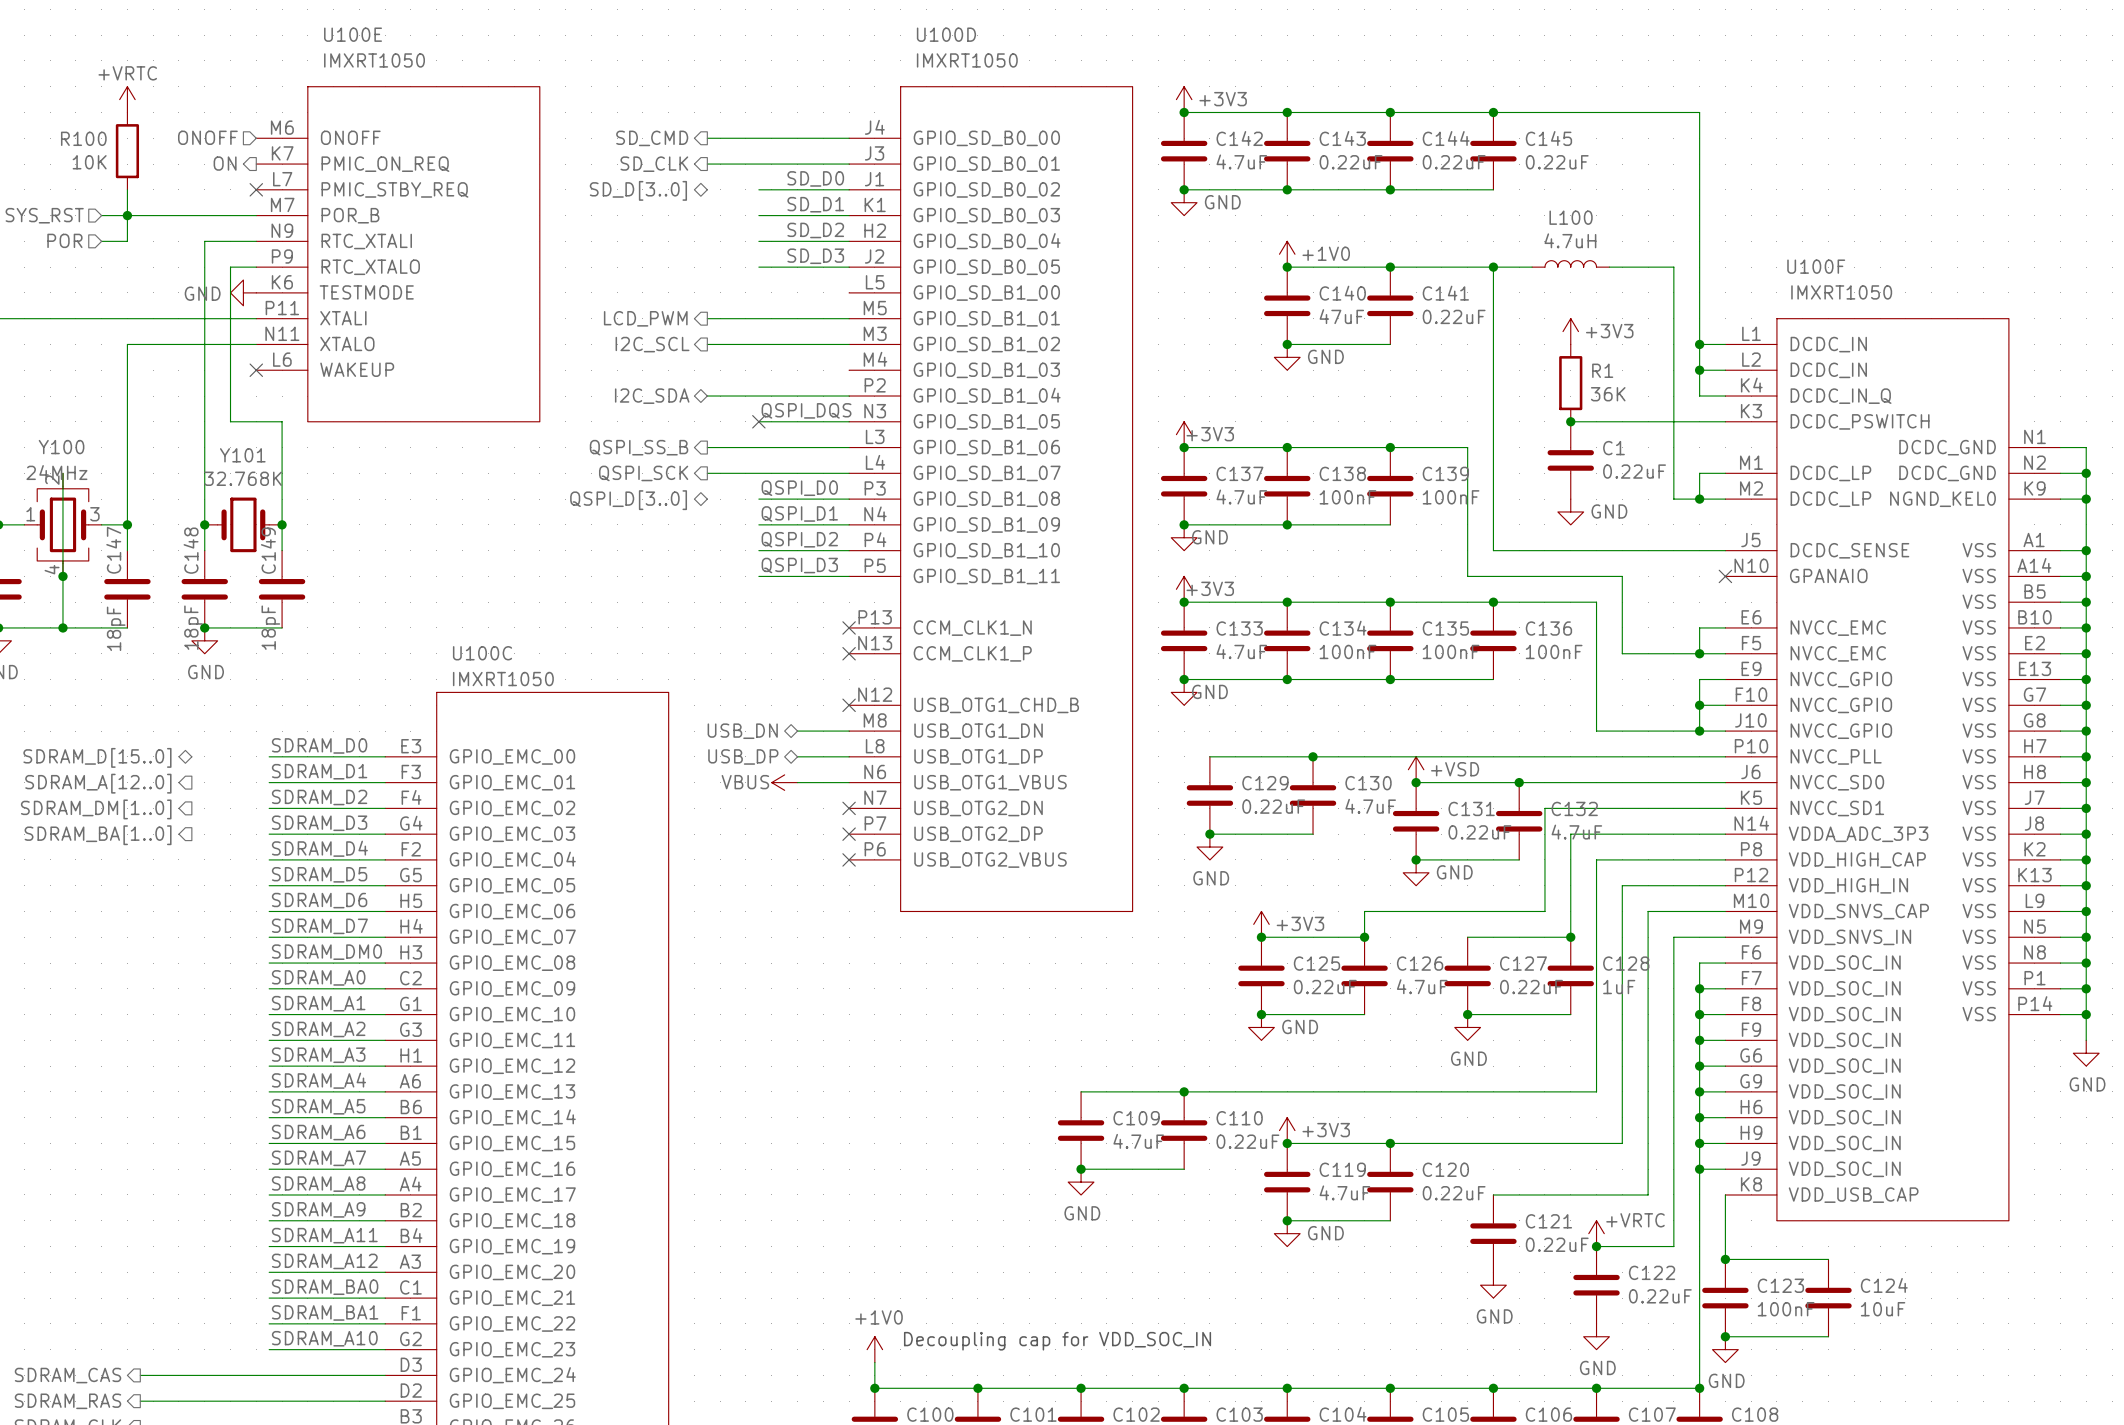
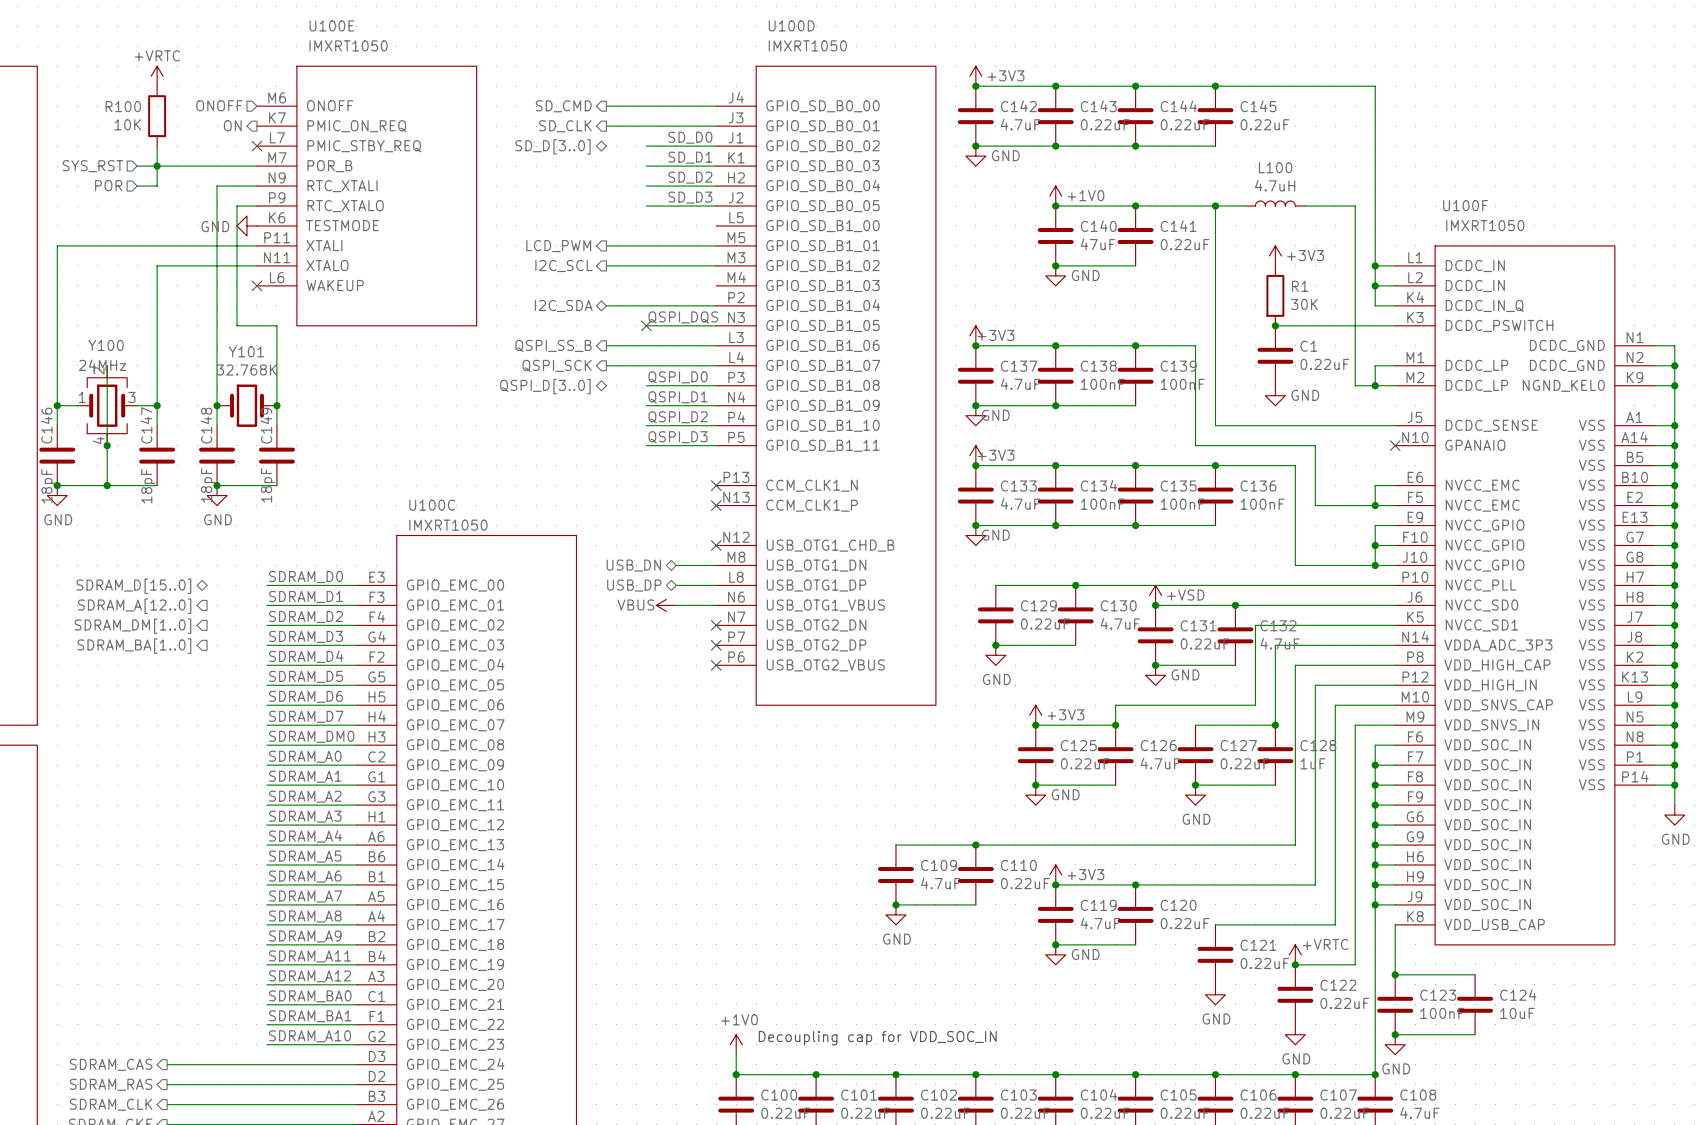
R1 value: 36K (1608, 394) -> 30K (1304, 304)

